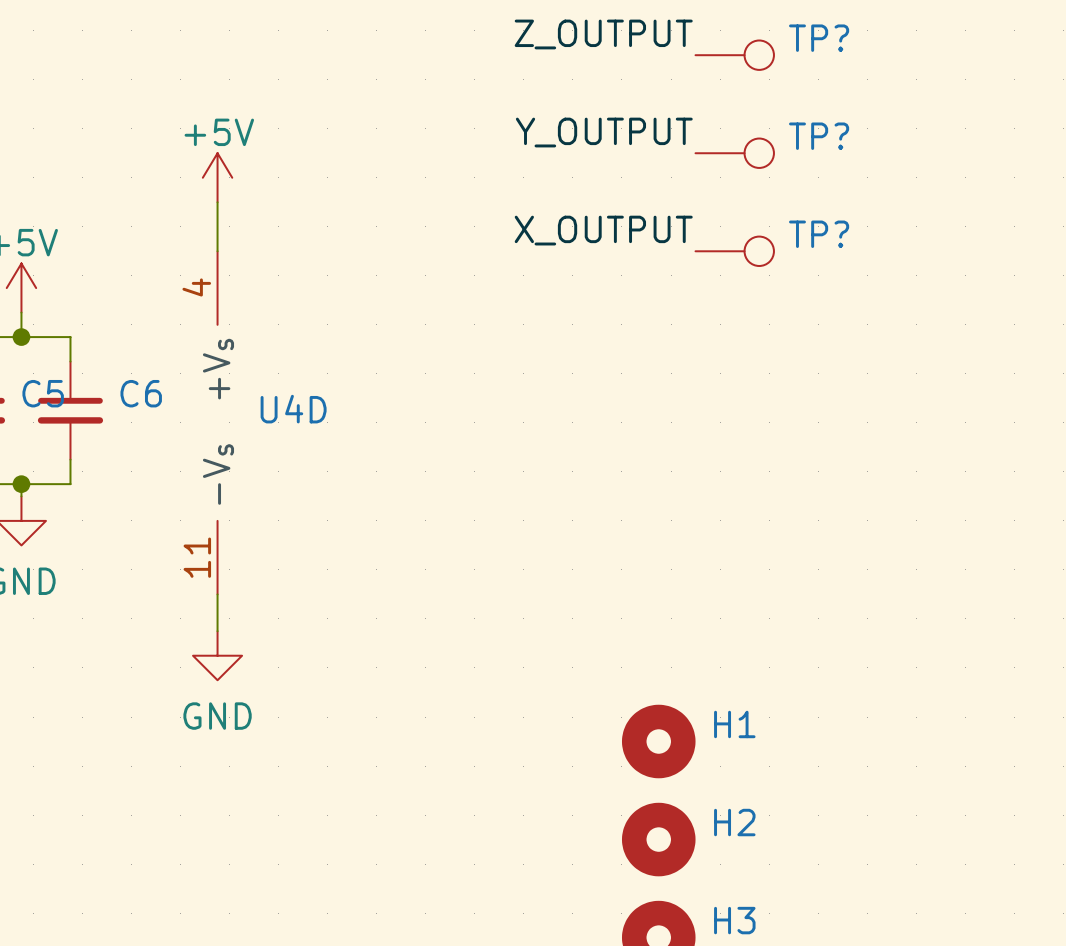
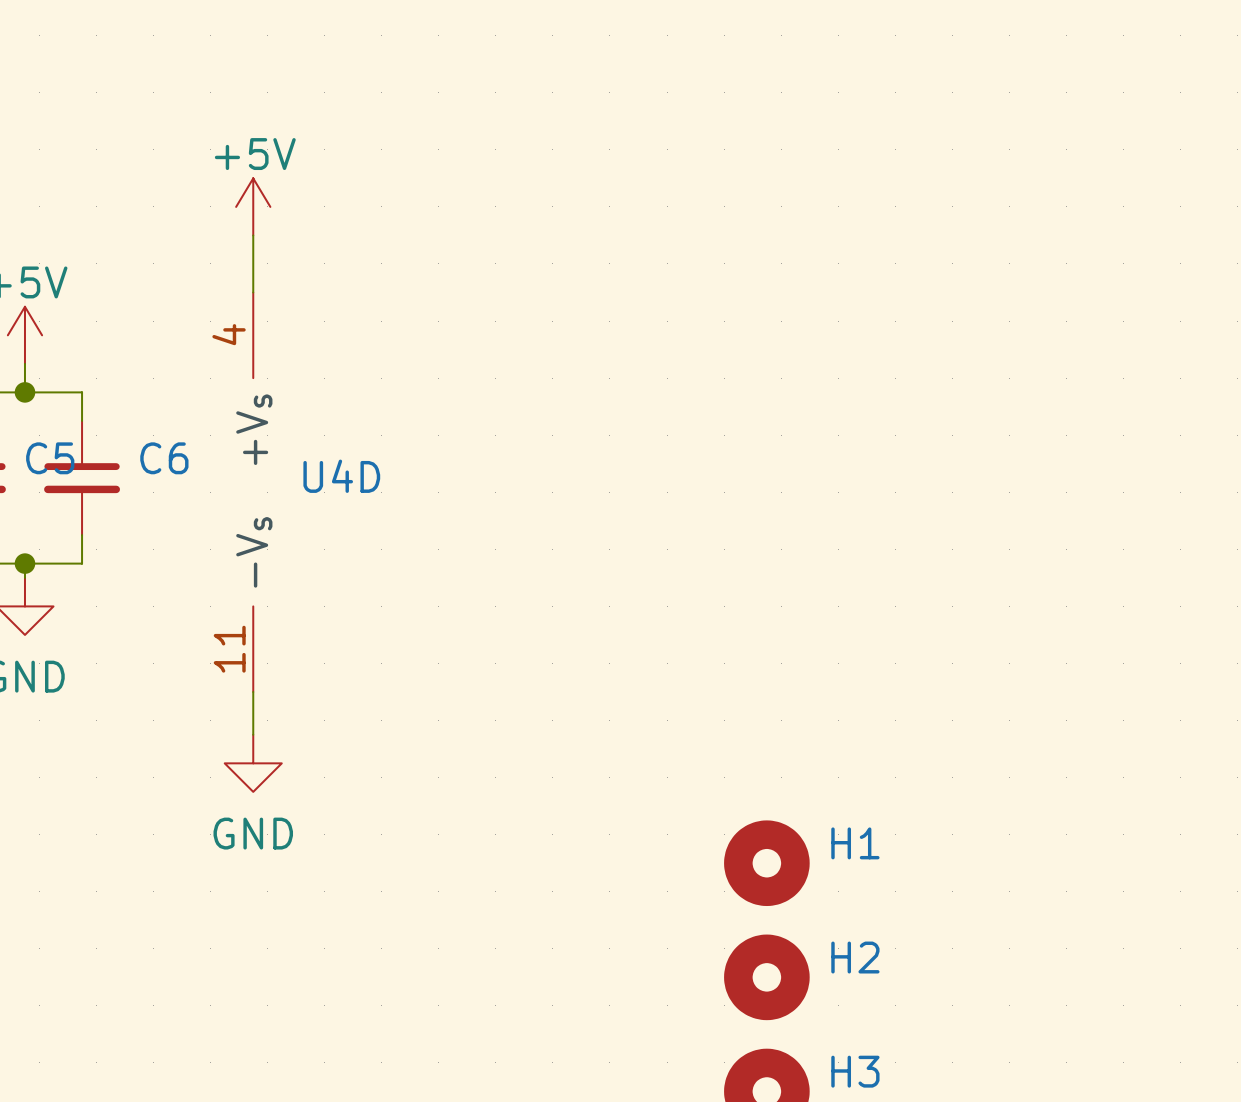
label: Z_OUTPUT (603, 34) -> none
TP?: (734, 55) -> none
label: Y_OUTPUT (604, 132) -> none
TP?: (734, 153) -> none
label: X_OUTPUT (603, 230) -> none
TP?: (734, 251) -> none

